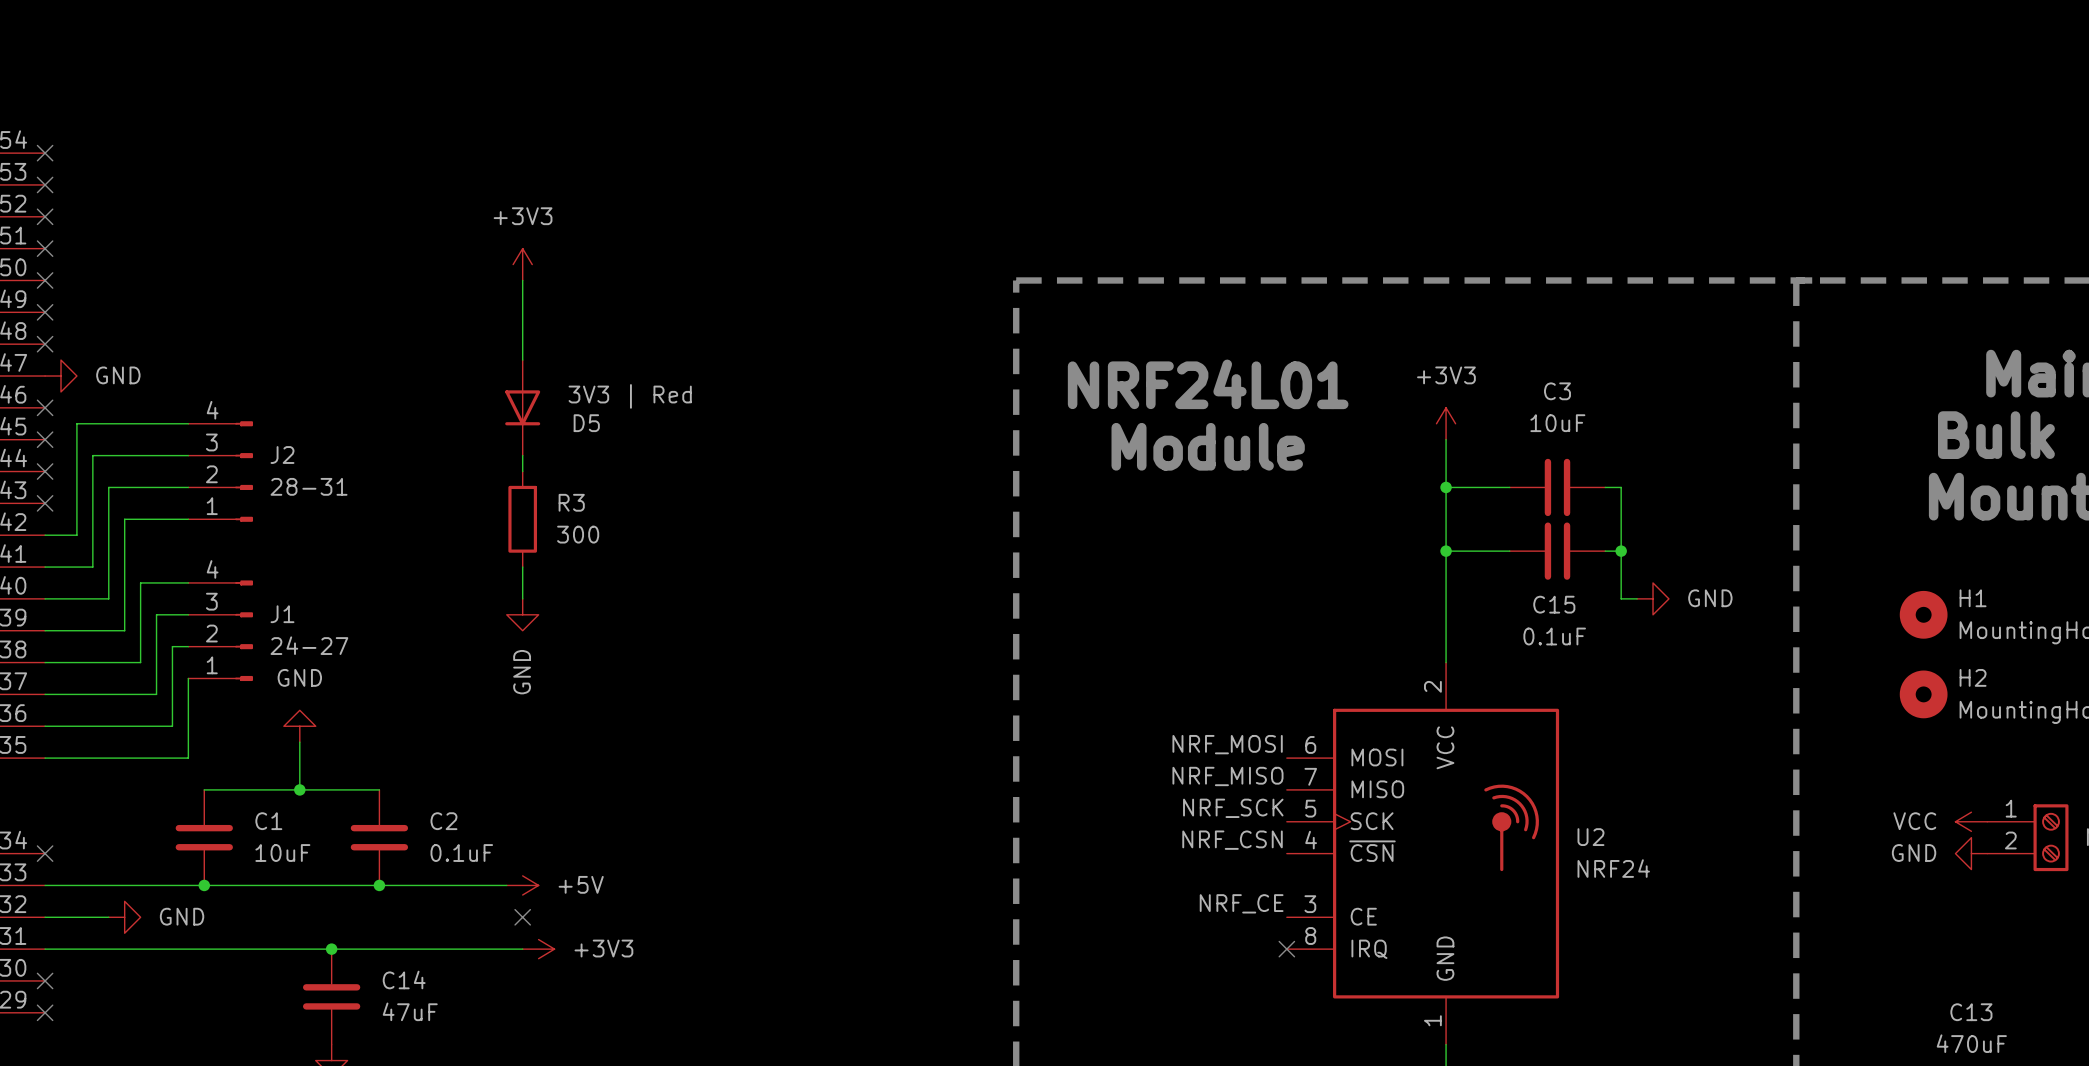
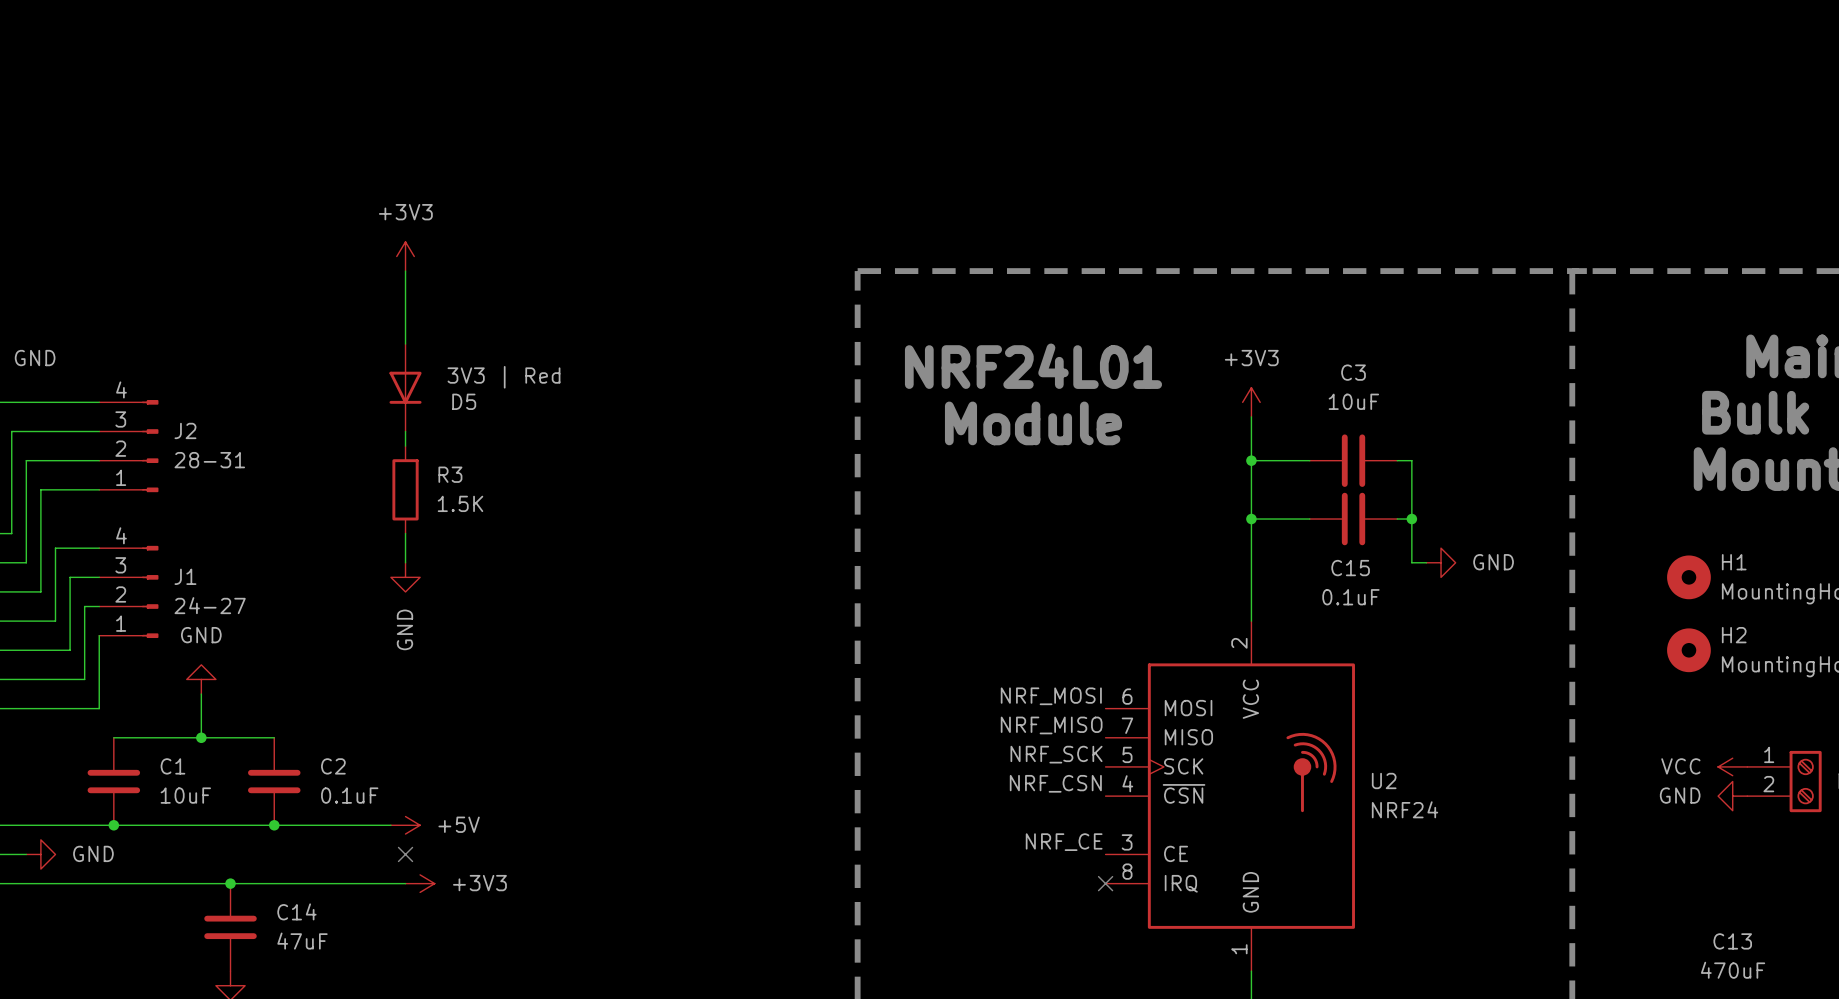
R3 value: 300 (578, 534) -> 1.5K (460, 503)

